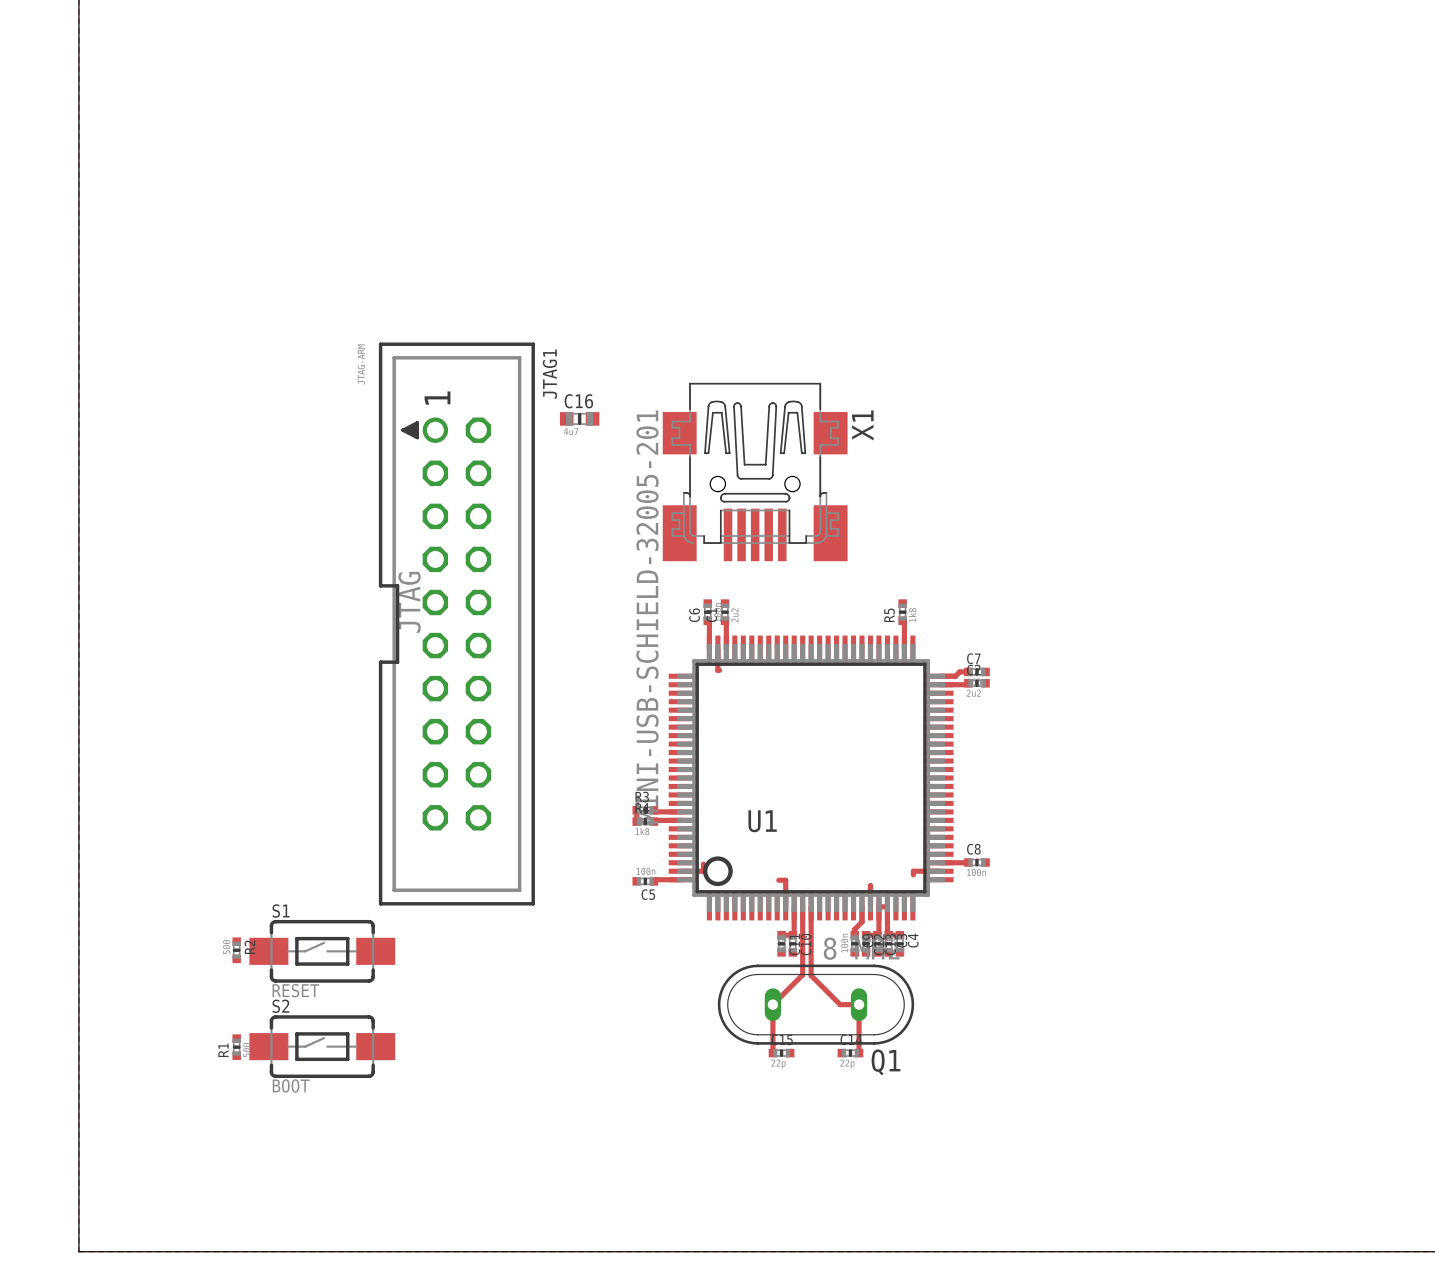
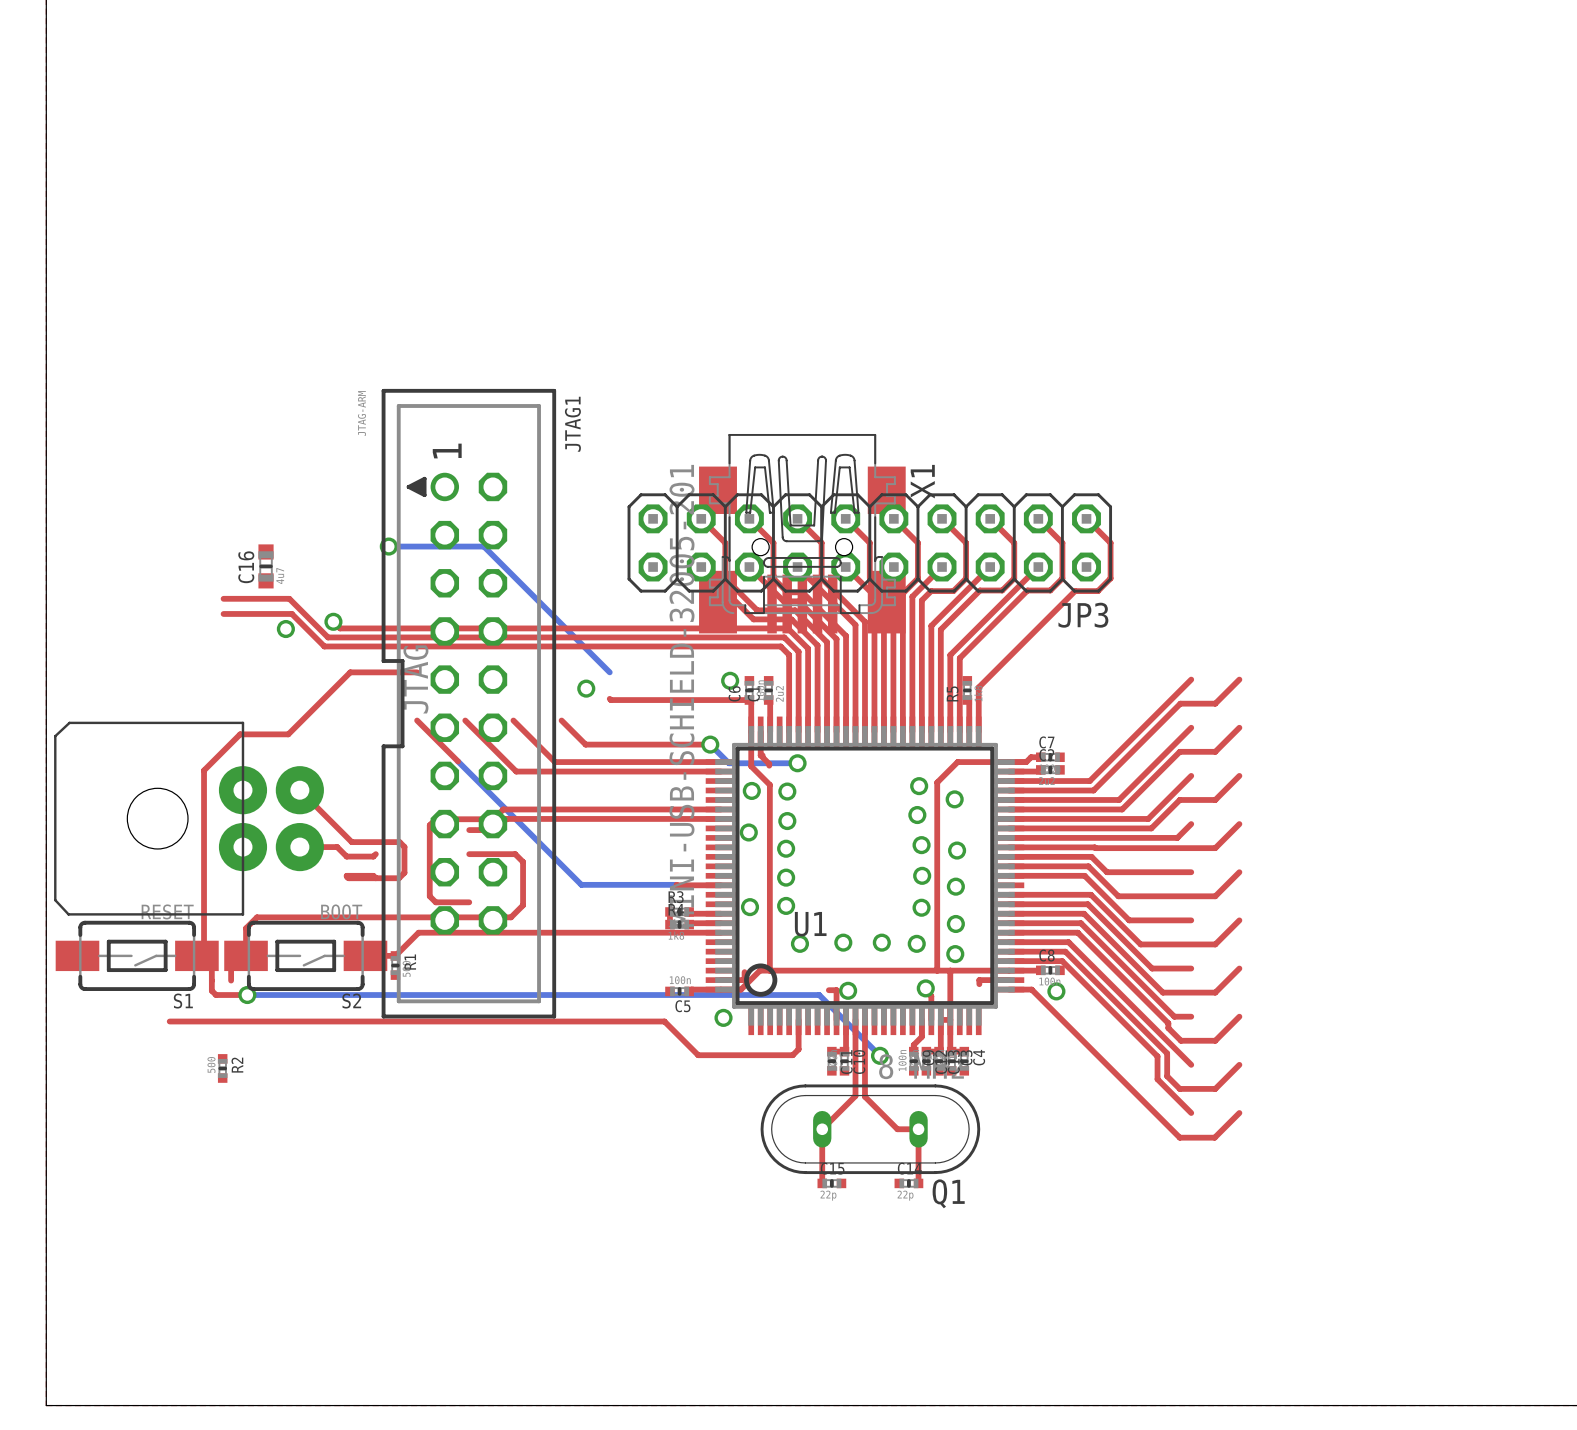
C16 rotation: 0° (579, 418) -> 90° clockwise (266, 566)
C16 position: (579, 418) -> (266, 566)
top track: none -> (701, 518) (725, 542) (725, 578) (757, 610) (795, 610) (827, 642) (827, 731)
top track: none -> (749, 518) (773, 542) (773, 578) (787, 592) (802, 592) (846, 635) (846, 731)
top track: none -> (797, 518) (821, 542) (821, 578) (864, 621) (864, 731)
top track: none -> (845, 518) (869, 542) (869, 578) (883, 592) (883, 731)
top track: none -> (893, 518) (917, 542) (917, 578) (902, 593) (902, 731)
top track: none -> (942, 518) (966, 542) (966, 578) (953, 591) (931, 591) (921, 600) (921, 731)
top track: none -> (990, 518) (1014, 542) (1014, 578) (1002, 590) (979, 590) (940, 629) (940, 731)
top track: none -> (1038, 518) (1062, 542) (1062, 578) (1050, 590) (1027, 590) (959, 658) (959, 731)
top track: none -> (1086, 518) (1110, 542) (1110, 578) (1097, 591) (1075, 591) (978, 687) (978, 731)
JP3: none -> (869, 542)
bottom track: none -> (388, 546) (483, 546) (609, 672)
via: none -> (388, 546)
top track: none -> (701, 567) (753, 619) (791, 619) (817, 645) (817, 731)
top track: none -> (749, 567) (783, 601) (798, 601) (836, 639) (836, 731)
top track: none -> (797, 567) (855, 624) (855, 731)
top track: none -> (845, 567) (874, 595) (874, 731)
top track: none -> (893, 567) (893, 731)
top track: none -> (942, 567) (912, 596) (912, 731)
top track: none -> (990, 567) (931, 625) (931, 731)
top track: none -> (1038, 567) (950, 655) (950, 731)
top track: none -> (223, 598) (289, 598) (328, 637) (784, 637) (798, 651) (798, 731)
top track: none -> (223, 613) (291, 613) (324, 646) (780, 646) (789, 654) (789, 731)
top track: none -> (333, 621) (340, 628) (787, 628) (808, 648) (808, 731)
via: none -> (333, 621)
via: none -> (285, 629)
top track: none -> (417, 672) (350, 672) (288, 734) (240, 734) (204, 770) (204, 954) (211, 961)
top track: none -> (1191, 679) (1089, 781) (1009, 781)
top track: none -> (1239, 679) (1215, 703) (1180, 703) (1093, 790) (1009, 790)
via: none -> (730, 680)
via: none -> (586, 688)
top track: none -> (609, 698) (749, 700)
top track: none -> (417, 720) (458, 761)
top track: none -> (465, 720) (516, 771) (720, 771)
top track: none -> (513, 720) (554, 762) (720, 762)
top track: none -> (561, 720) (585, 744) (710, 744)
top track: none -> (1191, 727) (1119, 799) (1009, 799)
top track: none -> (1239, 727) (1215, 751) (1179, 751) (1122, 809) (1009, 809)
top track: none -> (751, 731) (751, 766) (769, 784) (769, 970)
bottom track: none -> (710, 744) (728, 763) (797, 763)
via: none -> (710, 744)
top track: none -> (760, 755) (769, 765)
bottom track: none -> (458, 761) (581, 884) (676, 884)
top track: none -> (1009, 762) (957, 762) (937, 782) (937, 970)
via: none -> (797, 763)
top track: none -> (1191, 775) (1148, 818) (1009, 818)
top track: none -> (1239, 775) (1215, 799) (1179, 799) (1151, 828) (1009, 828)
via: none -> (919, 786)
top track: none -> (299, 790) (351, 842) (399, 842) (404, 846) (404, 872) (399, 878) (349, 878) (346, 875) (373, 875) (375, 877)
via: none -> (751, 790)
via: none -> (787, 791)
via: none -> (954, 799)
top track: none -> (720, 809) (503, 809) (493, 819) (435, 819) (429, 825) (429, 896) (435, 902) (469, 902)
via: none -> (917, 815)
part: none -> (189, 818)
top track: none -> (720, 818) (506, 818) (495, 830) (469, 830)
via: none -> (787, 821)
top track: none -> (1191, 824) (1177, 837) (1009, 837)
top track: none -> (1239, 824) (1215, 848) (1009, 847)
via: none -> (748, 832)
via: none -> (921, 845)
top track: none -> (299, 847) (337, 847) (346, 856) (373, 856) (375, 854)
via: none -> (786, 848)
via: none -> (957, 850)
top track: none -> (469, 854) (515, 854) (523, 861) (523, 905) (511, 917) (256, 917) (246, 928) (246, 955) (231, 955) (231, 980)
top track: none -> (1009, 856) (1091, 856) (1106, 872) (1191, 872)
top track: none -> (1009, 866) (1088, 866) (1118, 896) (1215, 896) (1239, 872)
via: none -> (922, 875)
top track: none -> (1009, 875) (1084, 875) (1129, 920) (1191, 920)
via: none -> (786, 877)
top track: none -> (676, 884) (720, 885)
via: none -> (955, 886)
top track: none -> (1009, 894) (1091, 894) (1140, 944) (1215, 944) (1239, 920)
top track: none -> (1009, 904) (1087, 904) (1152, 968) (1191, 968)
via: none -> (786, 905)
via: none -> (750, 907)
via: none -> (921, 907)
top track: none -> (1009, 913) (1084, 913) (1162, 992) (1215, 992) (1239, 968)
top track: none -> (1009, 923) (1080, 923) (1174, 1016) (1191, 1016)
via: none -> (955, 923)
top track: none -> (720, 932) (418, 932) (395, 955) (365, 955)
top track: none -> (1009, 932) (1077, 932) (1168, 1023) (1168, 1028) (1181, 1040) (1215, 1040) (1239, 1016)
via: none -> (843, 942)
via: none -> (881, 942)
top track: none -> (1009, 942) (1068, 942) (1191, 1064)
via: none -> (799, 943)
via: none -> (916, 943)
top track: none -> (1009, 951) (1065, 951) (1167, 1053) (1167, 1076) (1179, 1088) (1215, 1088) (1239, 1064)
via: none -> (955, 954)
top track: none -> (196, 955) (211, 955) (211, 990) (216, 995) (247, 995)
top track: none -> (1009, 961) (1062, 961) (1157, 1056) (1157, 1079) (1191, 1113)
top track: none -> (950, 970) (950, 1019)
top track: none -> (1009, 970) (759, 970) (740, 989) (720, 989)
via: none -> (925, 988)
top track: none -> (1009, 989) (1031, 989) (1179, 1137) (1214, 1137) (1239, 1113)
via: none -> (848, 990)
via: none -> (1056, 991)
bottom track: none -> (247, 995) (819, 995) (880, 1055)
via: none -> (247, 995)
via: none -> (723, 1017)
top track: none -> (798, 1019) (798, 1049) (792, 1055) (698, 1055) (664, 1021) (169, 1021)
via: none -> (880, 1055)
S1 rotation: 0° (322, 951) -> 180° (137, 955)
S1 position: (322, 951) -> (137, 955)
S2 rotation: 0° (322, 1046) -> 180° (305, 955)
S2 position: (322, 1046) -> (305, 955)
R1 position: (236, 1047) -> (395, 965)
R1 name position: R1 (223, 1050) -> R1 (410, 962)

